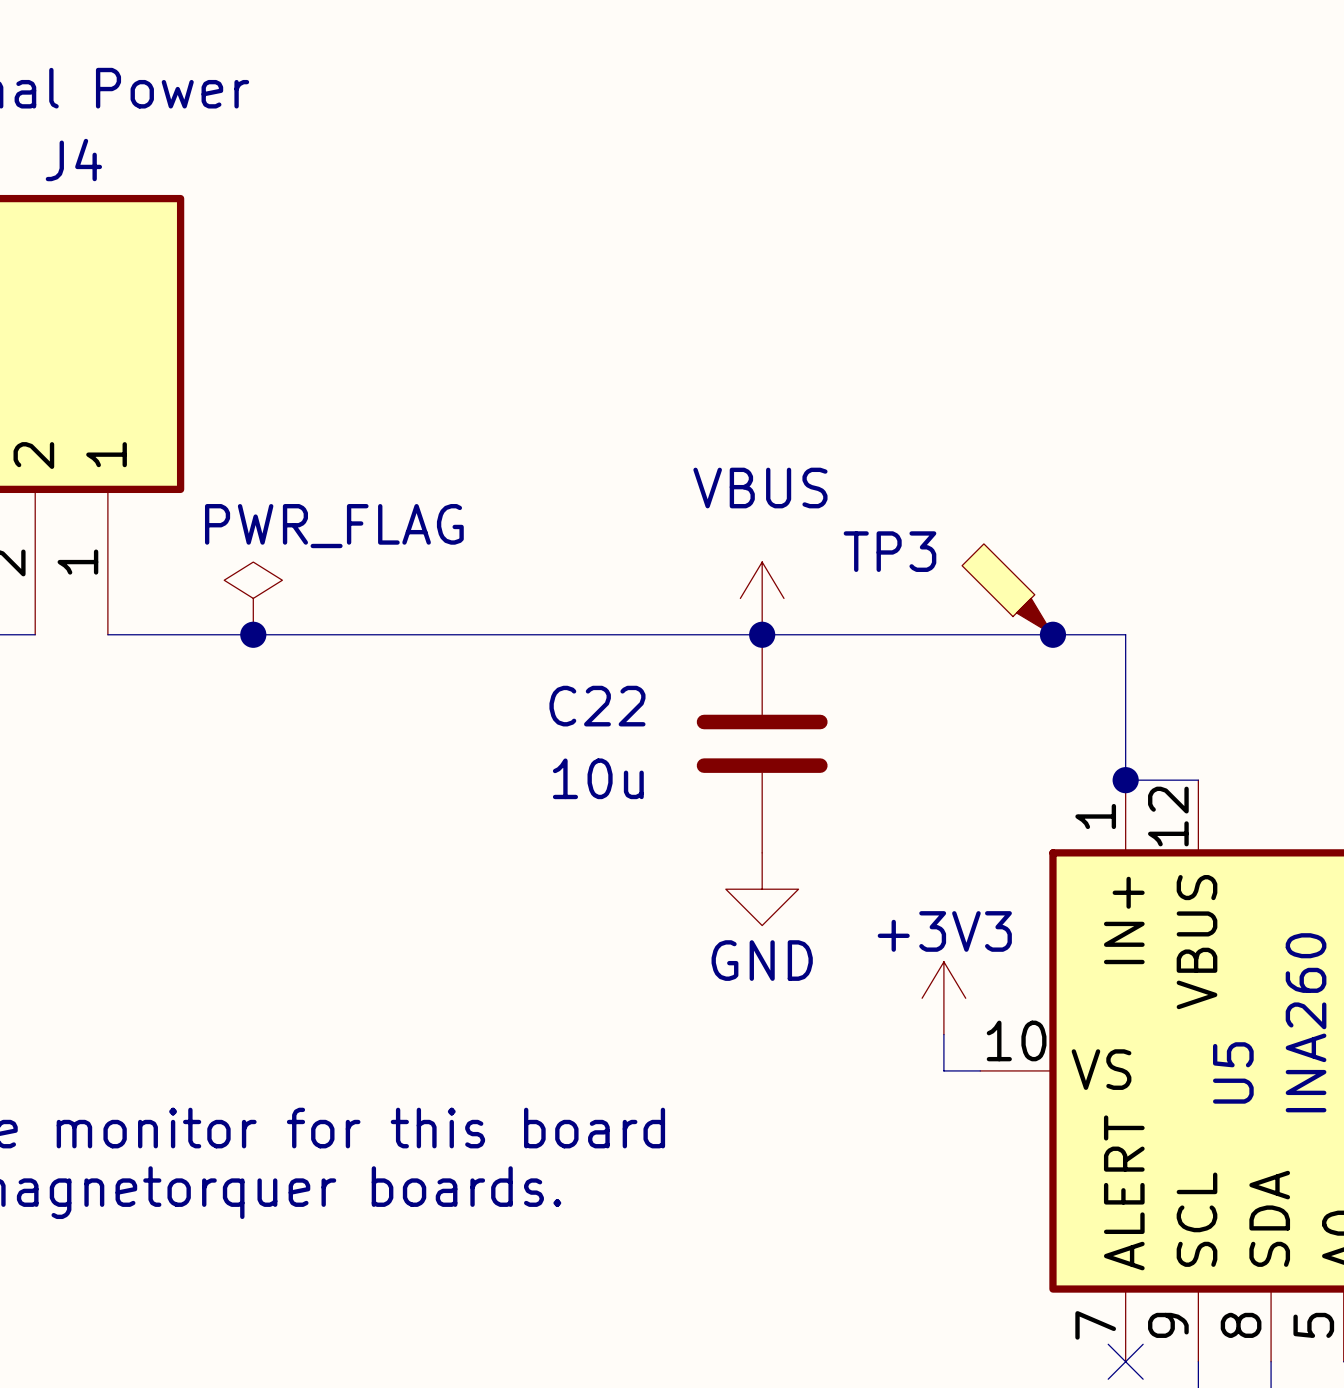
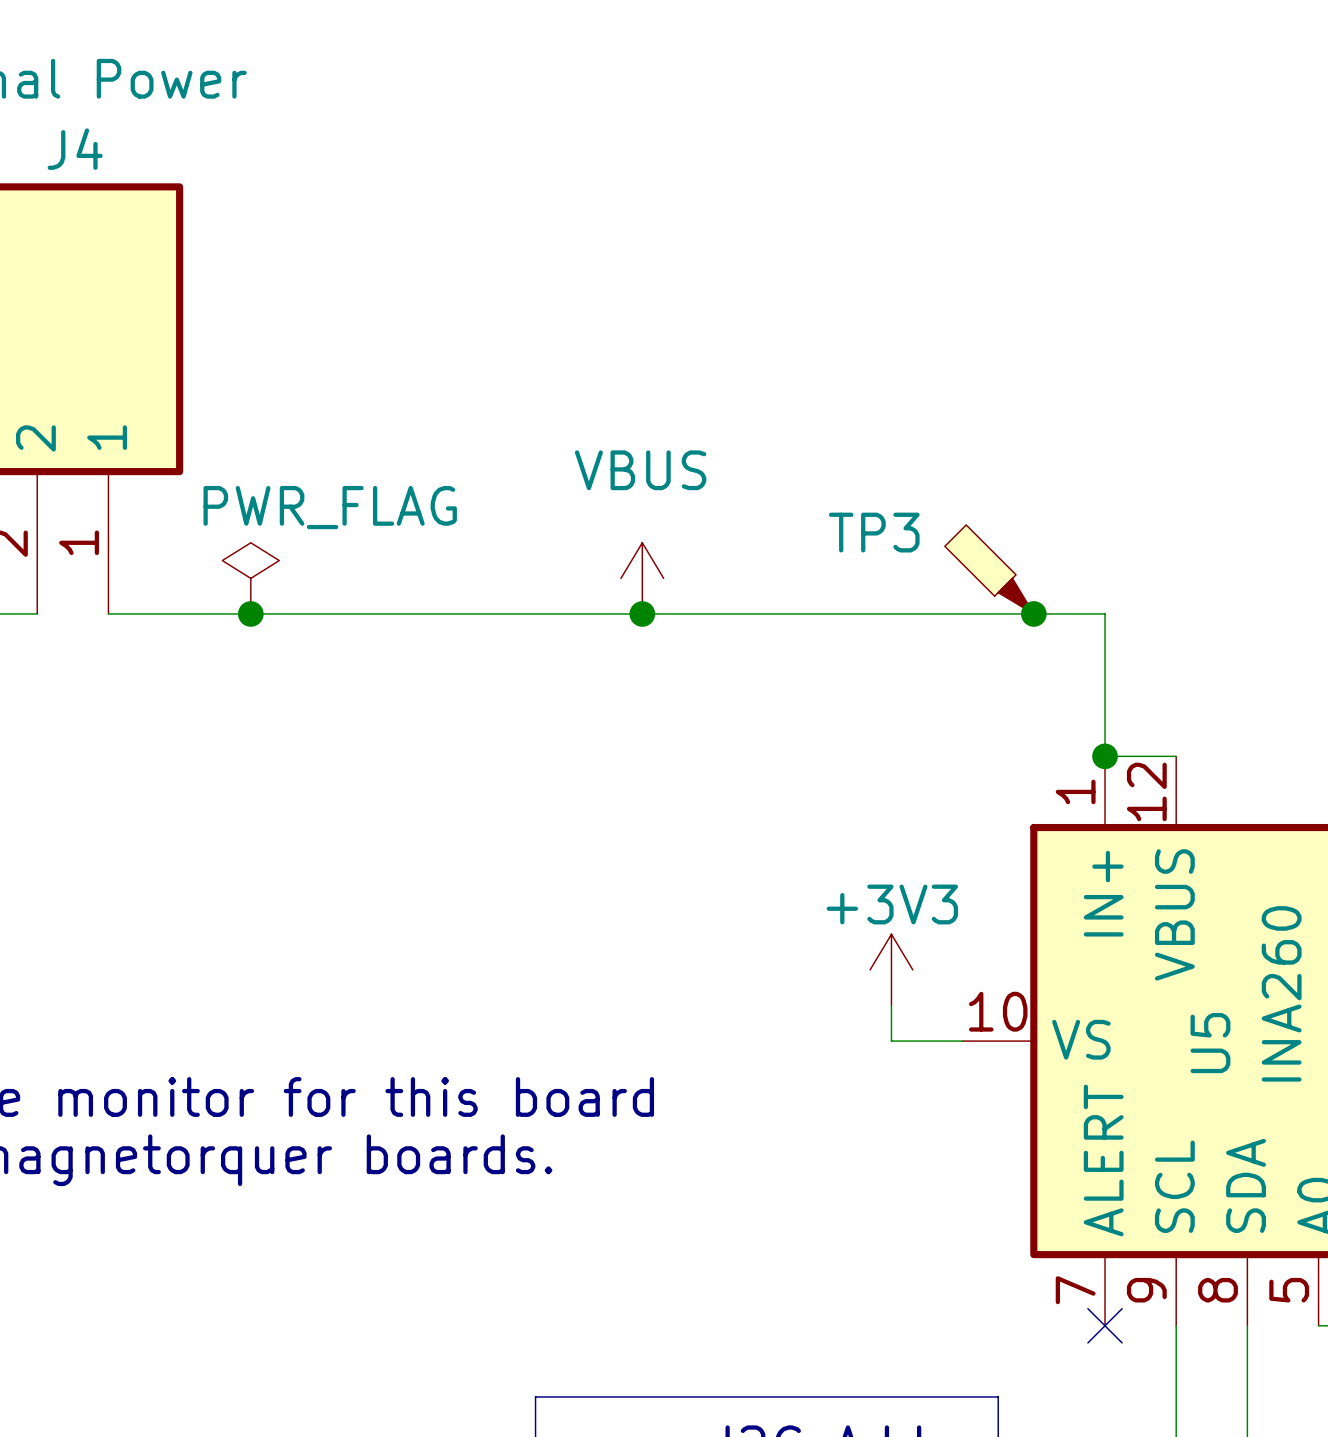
power symbol position: VBUS (762, 598) -> VBUS (642, 578)
junction position: (762, 634) -> (642, 613)
C22: 10u (762, 743) -> none
power symbol: GND (762, 889) -> none
power symbol position: +3V3 (943, 998) -> +3V3 (891, 969)
wire: (943, 1034) (943, 1070) -> (891, 1005) (891, 1041) (927, 1041)

